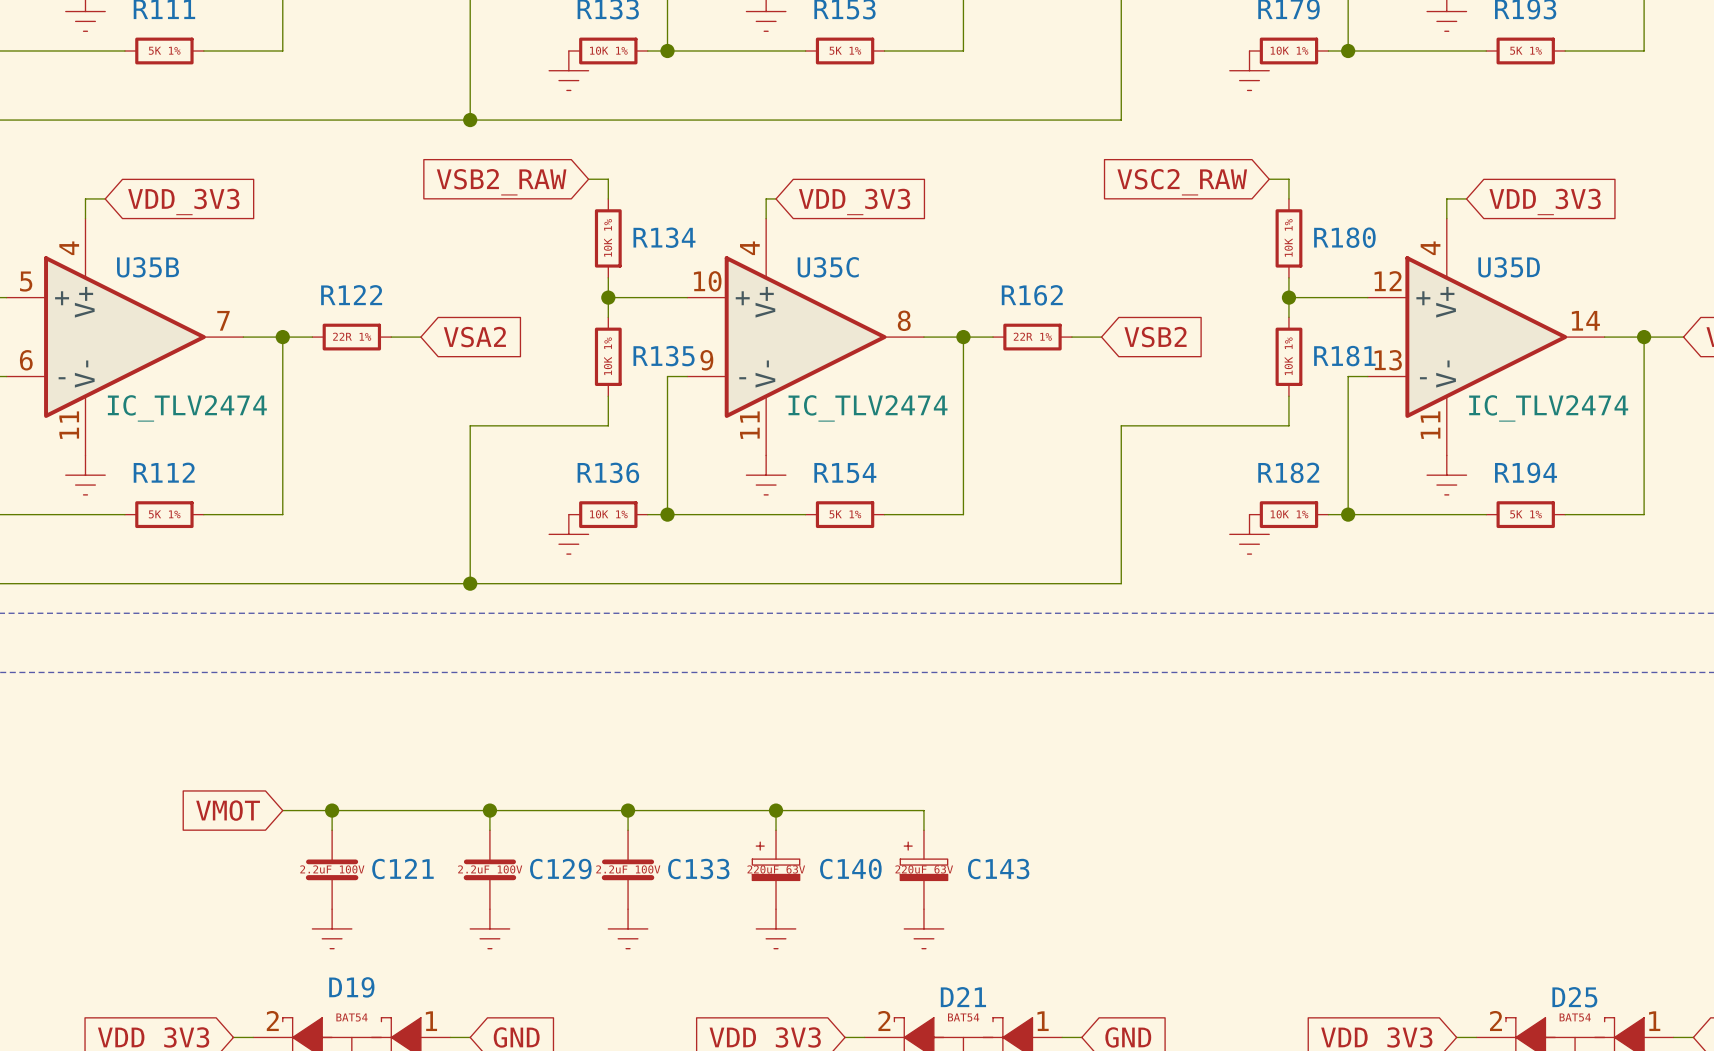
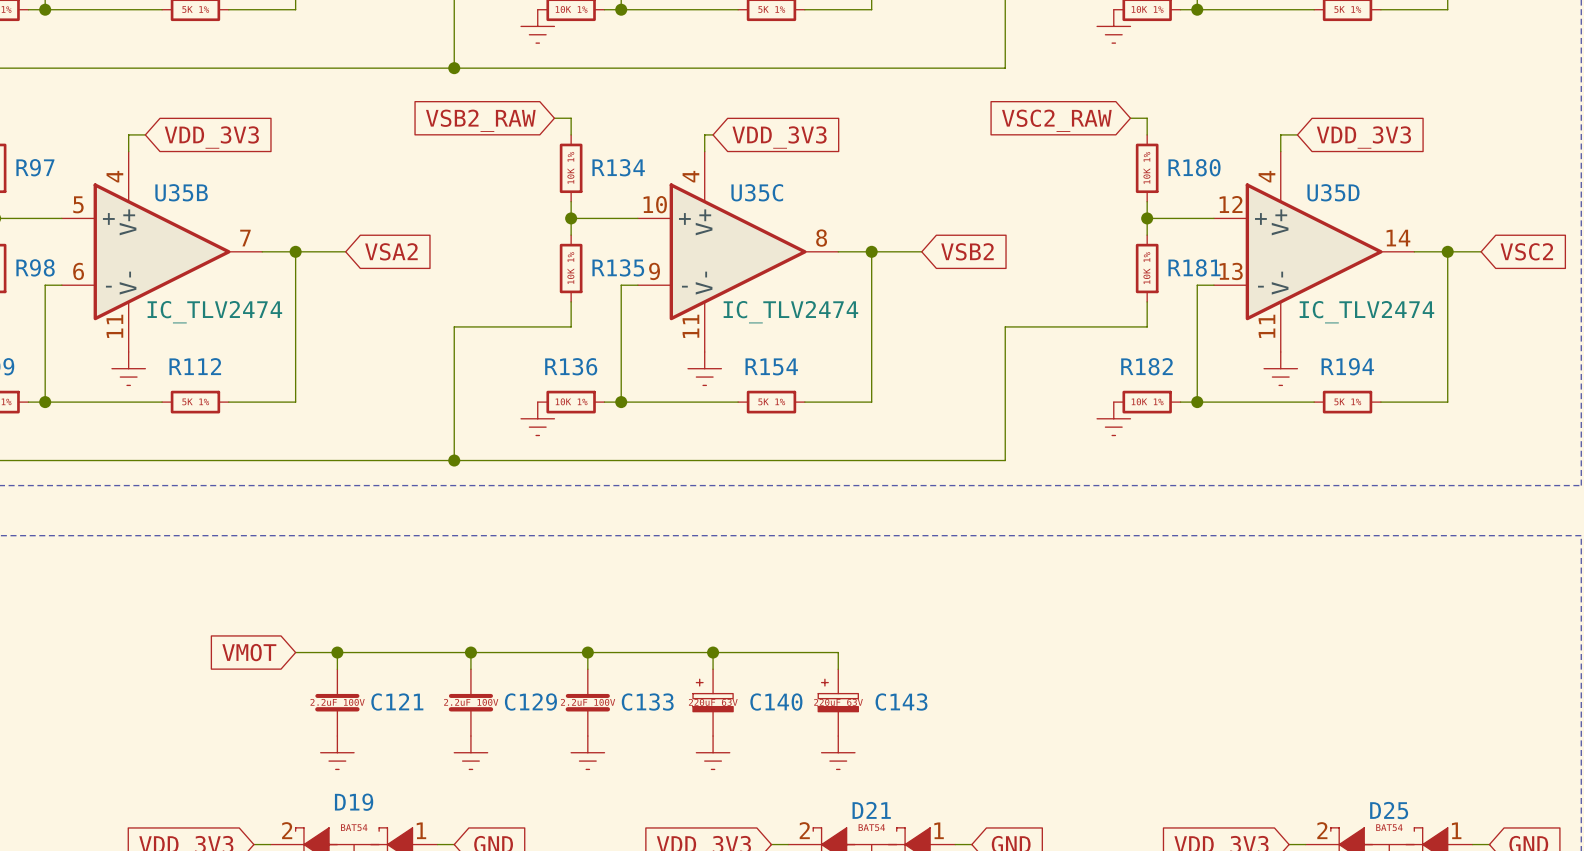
R122: (351, 337) -> none
wire: (391, 337) (420, 337) -> (320, 251) (345, 251)
global label position: VSA2 (474, 337) -> VSA2 (391, 251)
R162: (1032, 337) -> none
wire: (1071, 337) (1101, 337) -> (896, 251) (921, 251)
global label position: VSB2 (1155, 337) -> VSB2 (967, 251)

